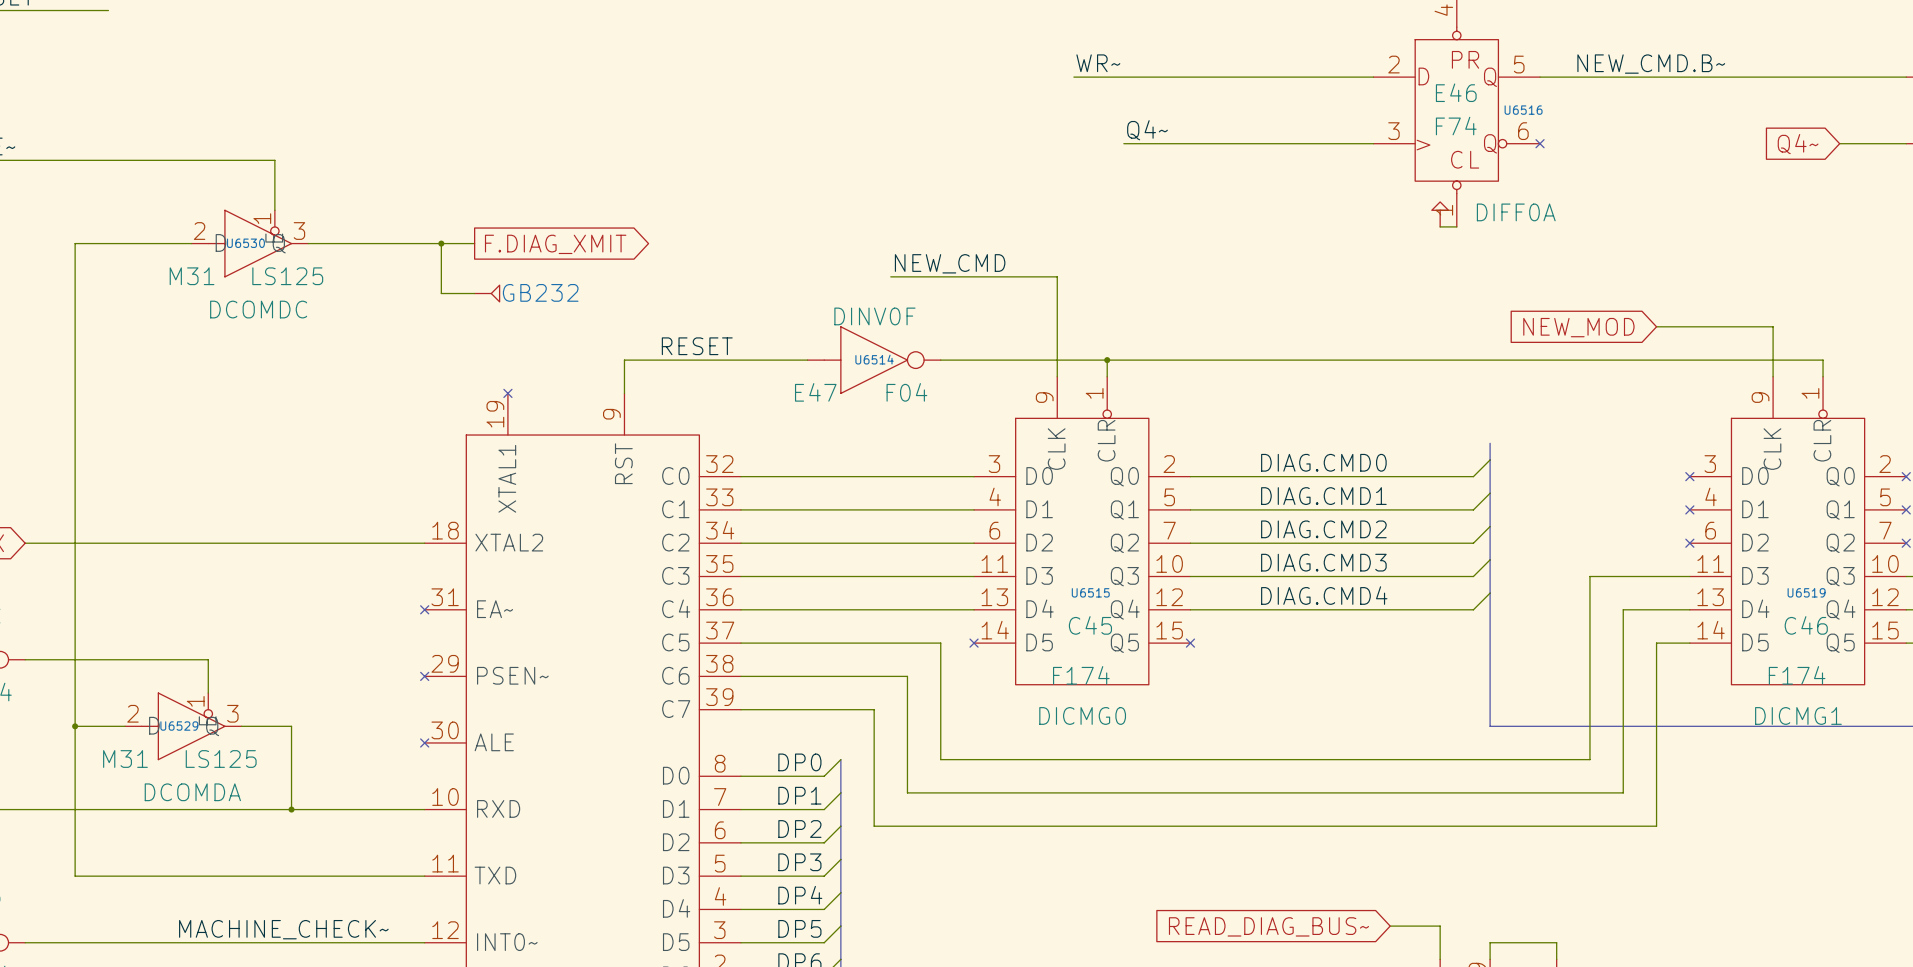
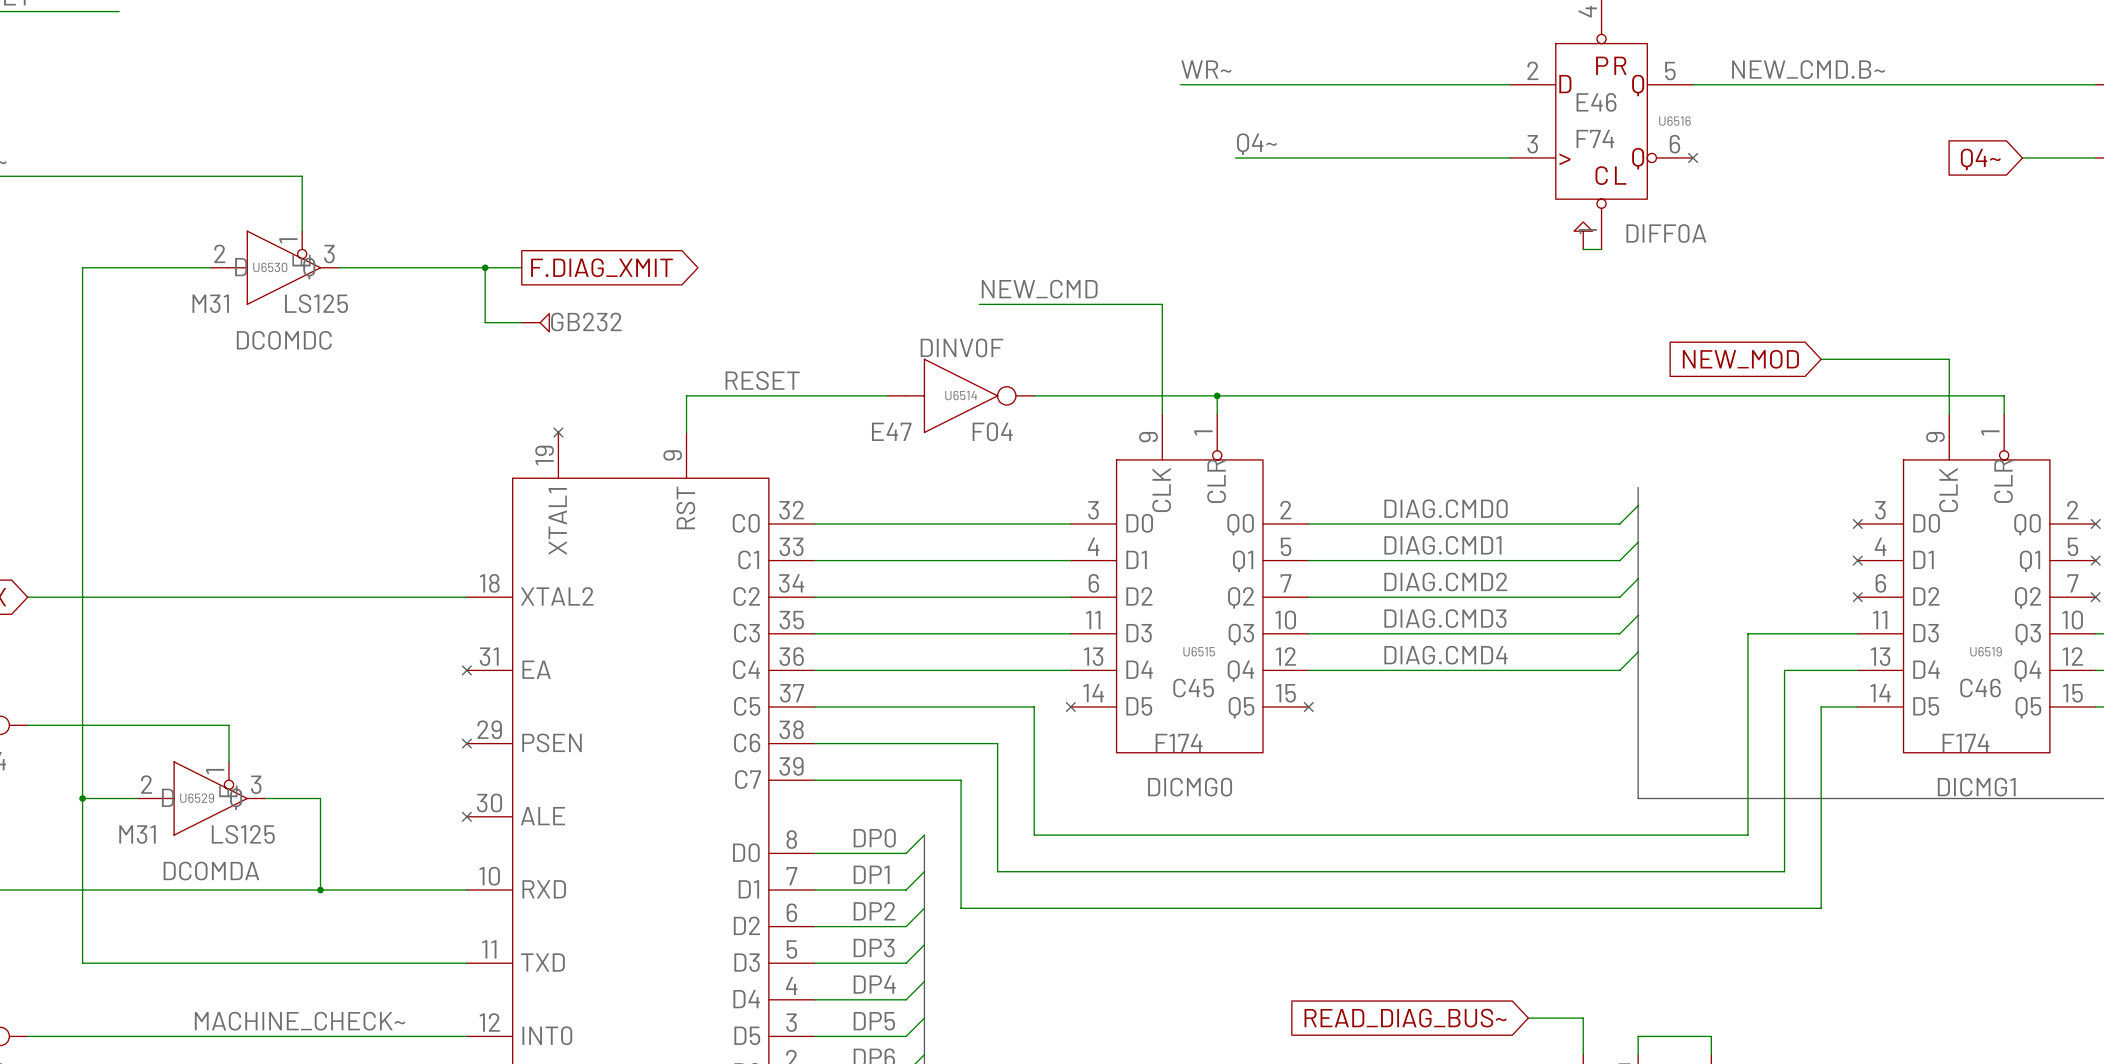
part pin name: EA~ (495, 609) -> EA (536, 669)
part pin name: PSEN~ (512, 675) -> PSEN (552, 742)
part pin name: INT0~ (507, 942) -> INT0 (547, 1035)

